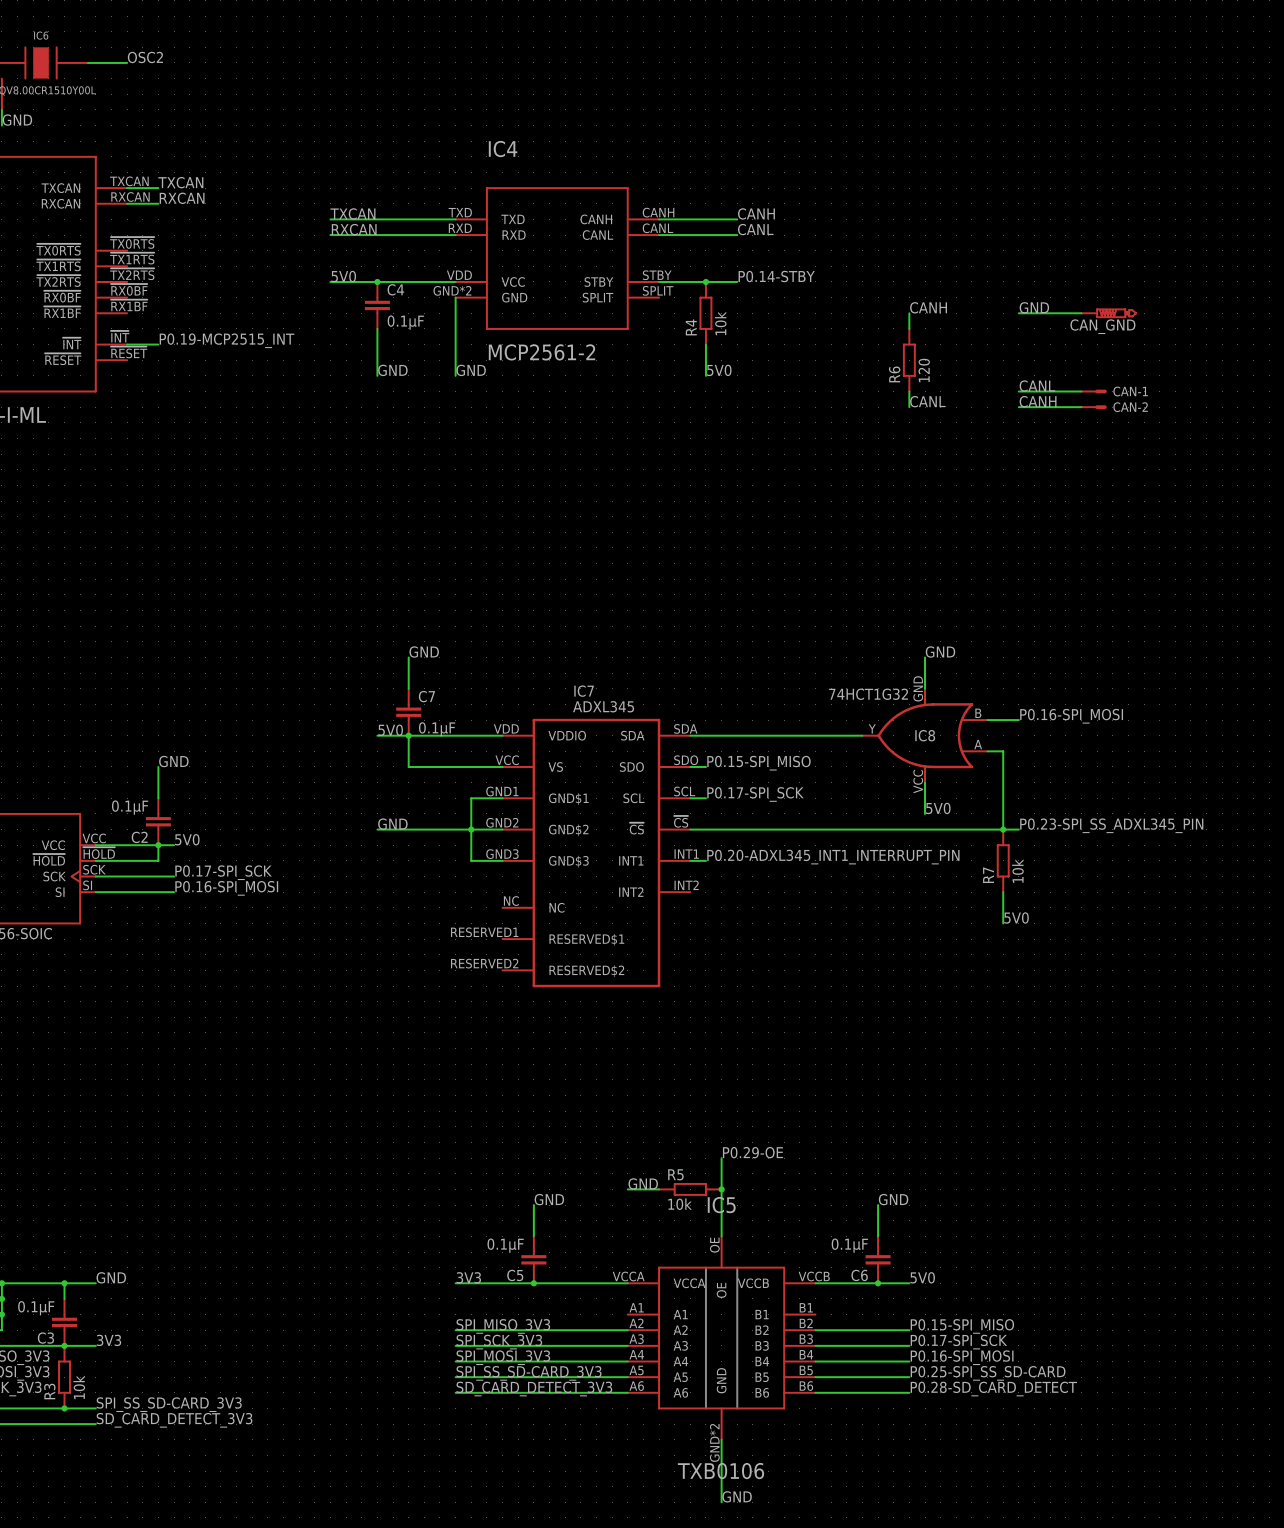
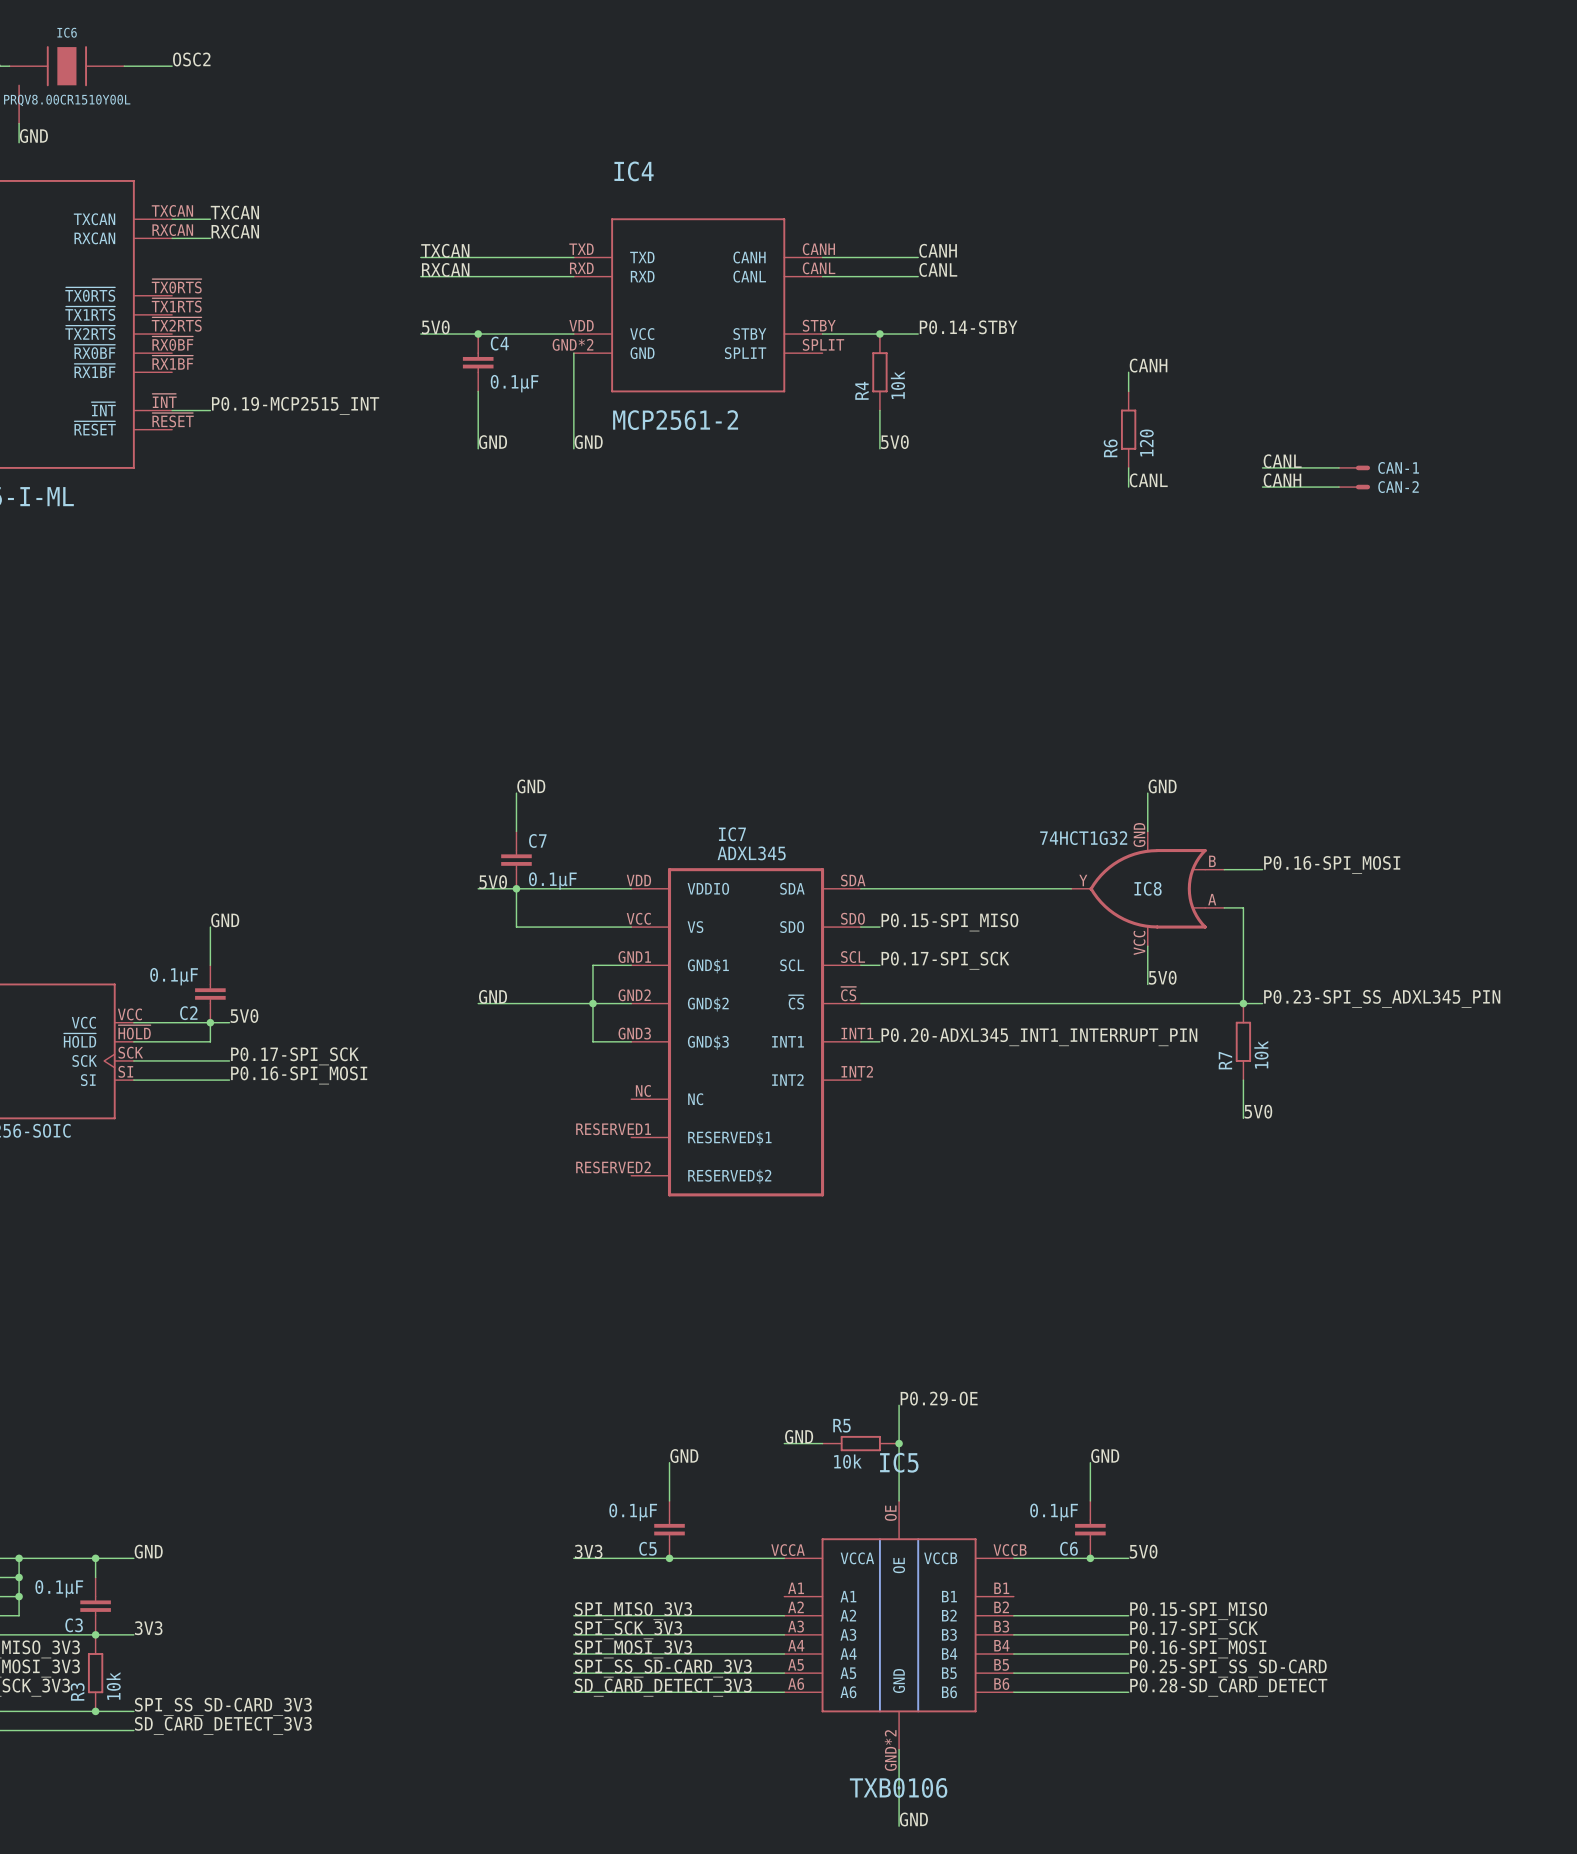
label: GND (1034, 307) -> none
wire: (1018, 313) (1081, 313) -> none
CAN_GND: (1109, 313) -> none

